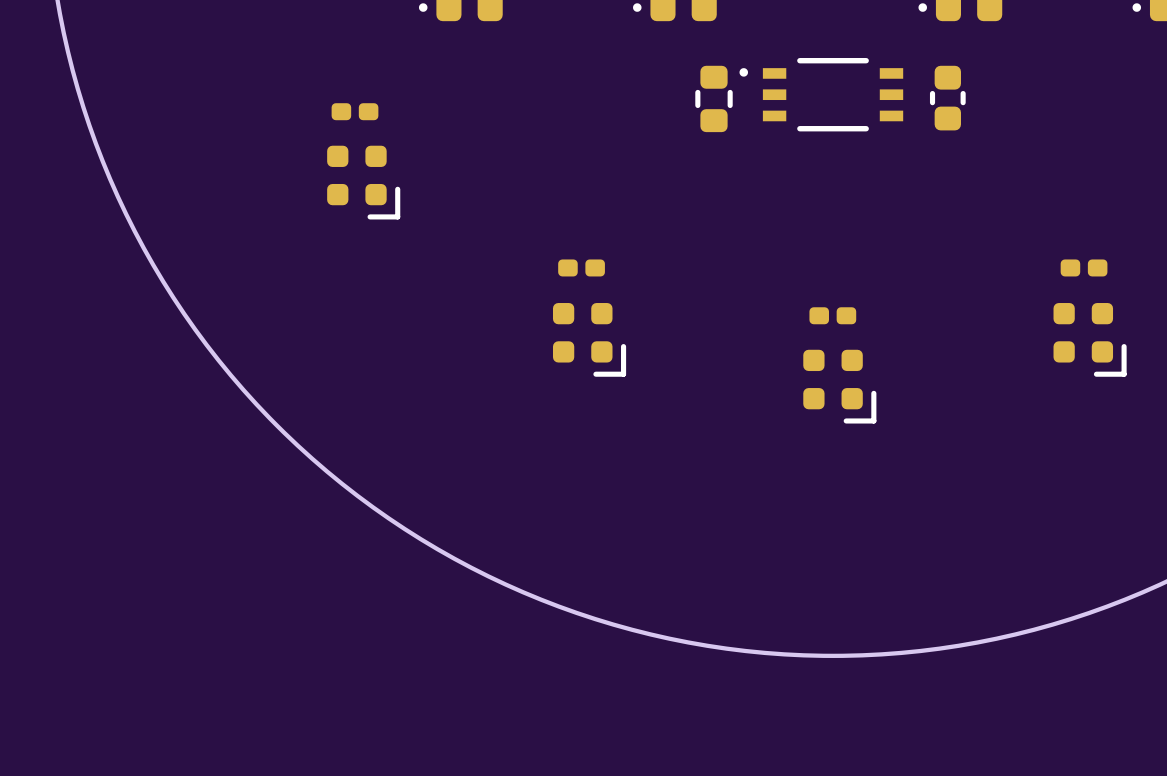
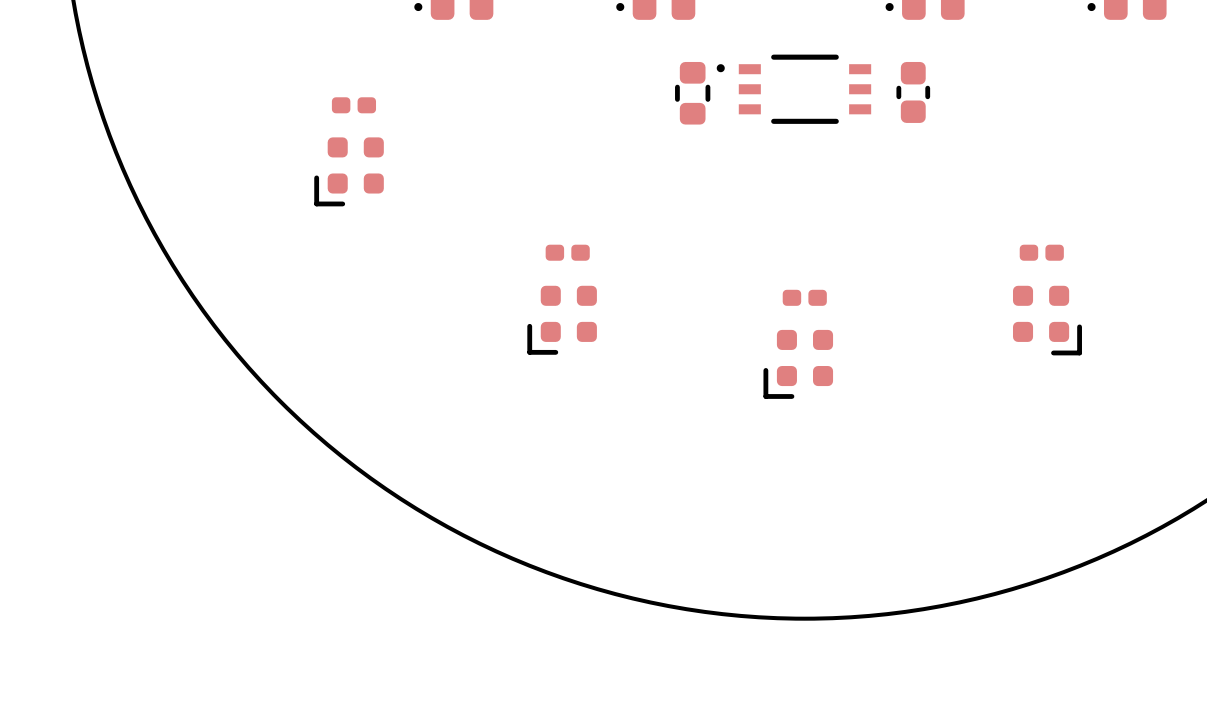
part rotation: 0° (363, 182) -> 90° clockwise (349, 171)
part rotation: 0° (589, 339) -> 90° clockwise (562, 320)
part rotation: 0° (839, 386) -> 90° clockwise (798, 364)

